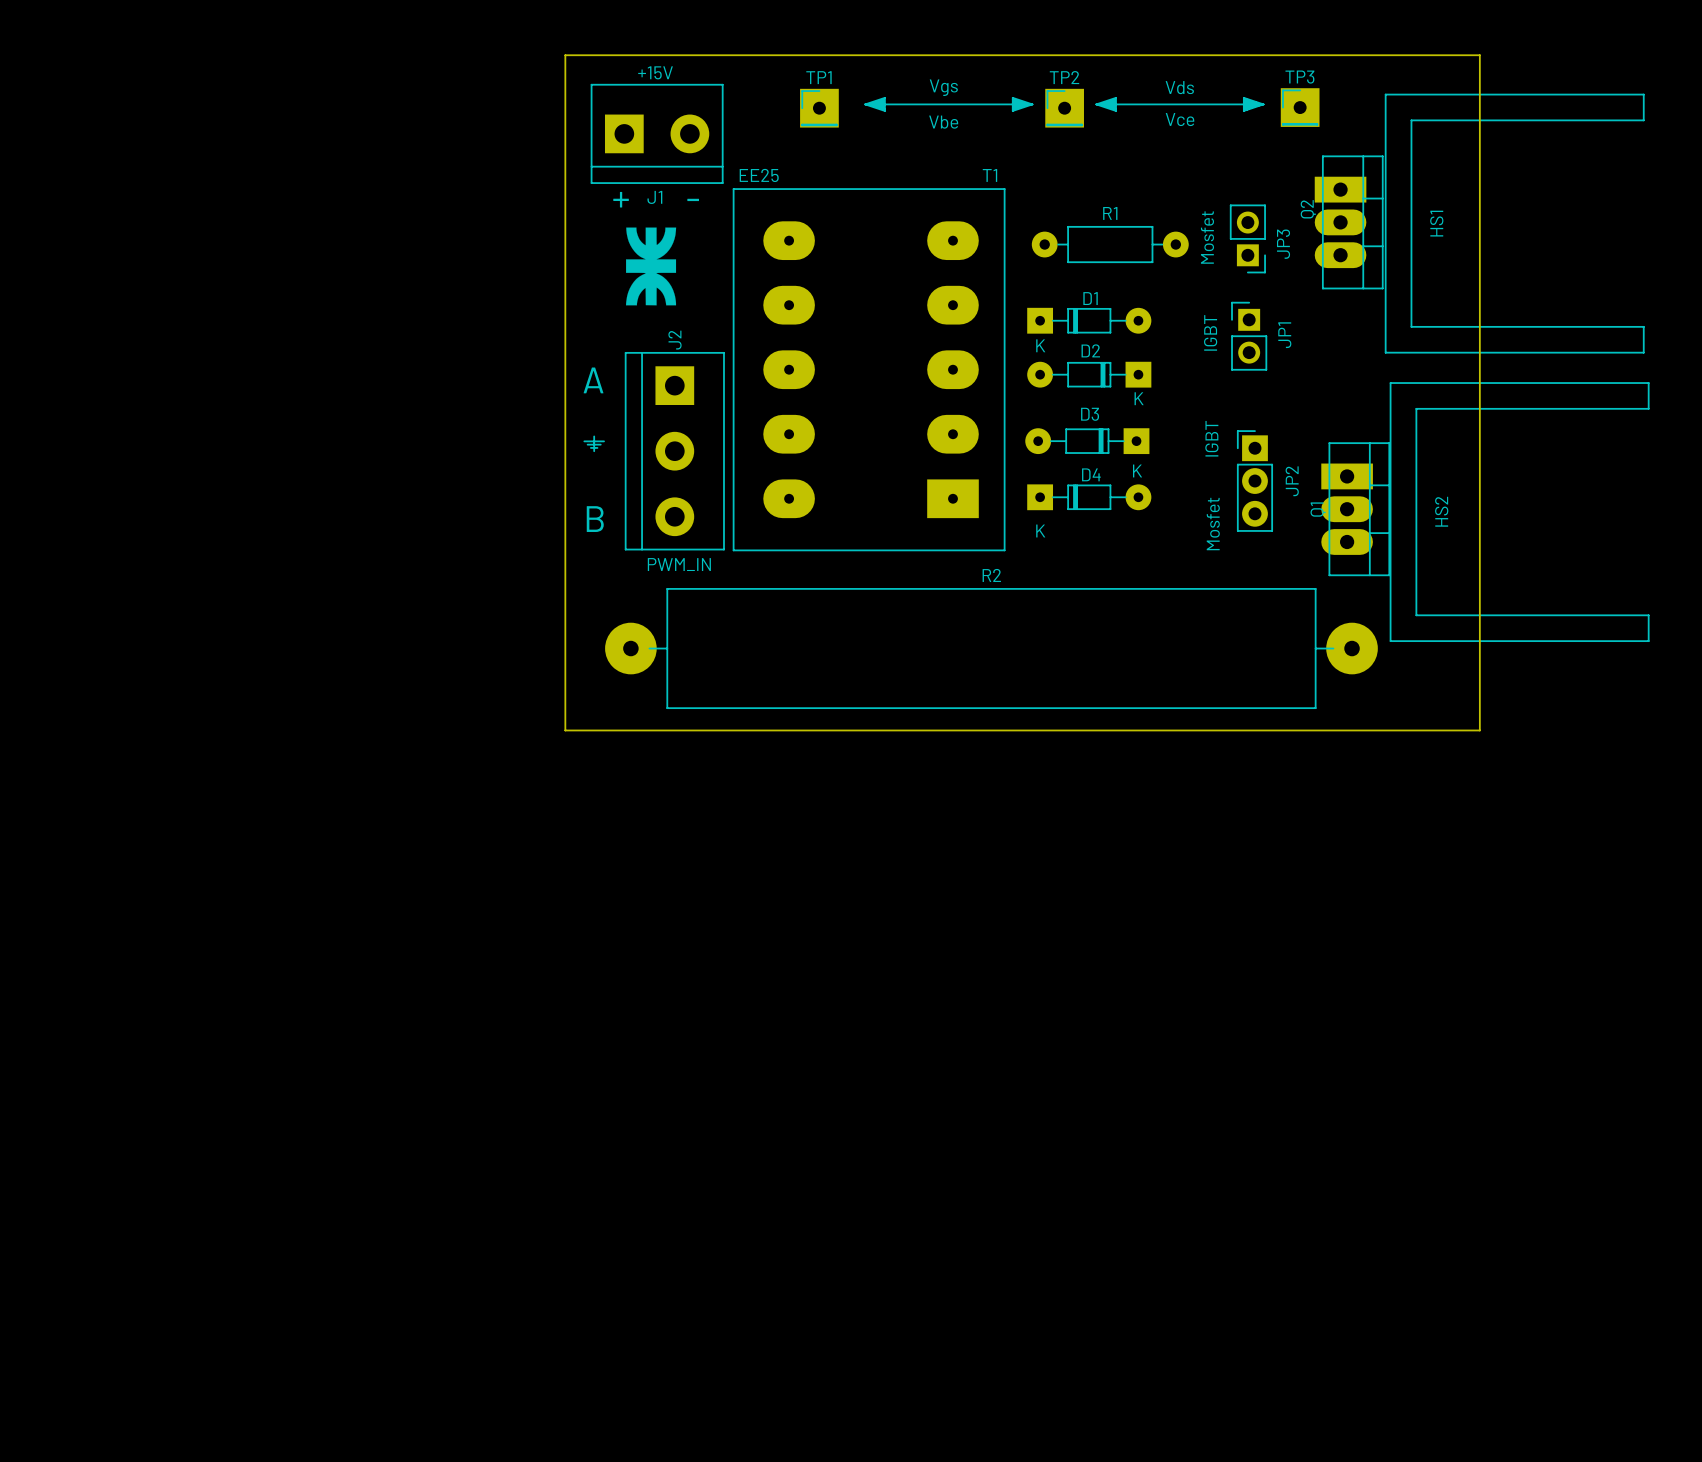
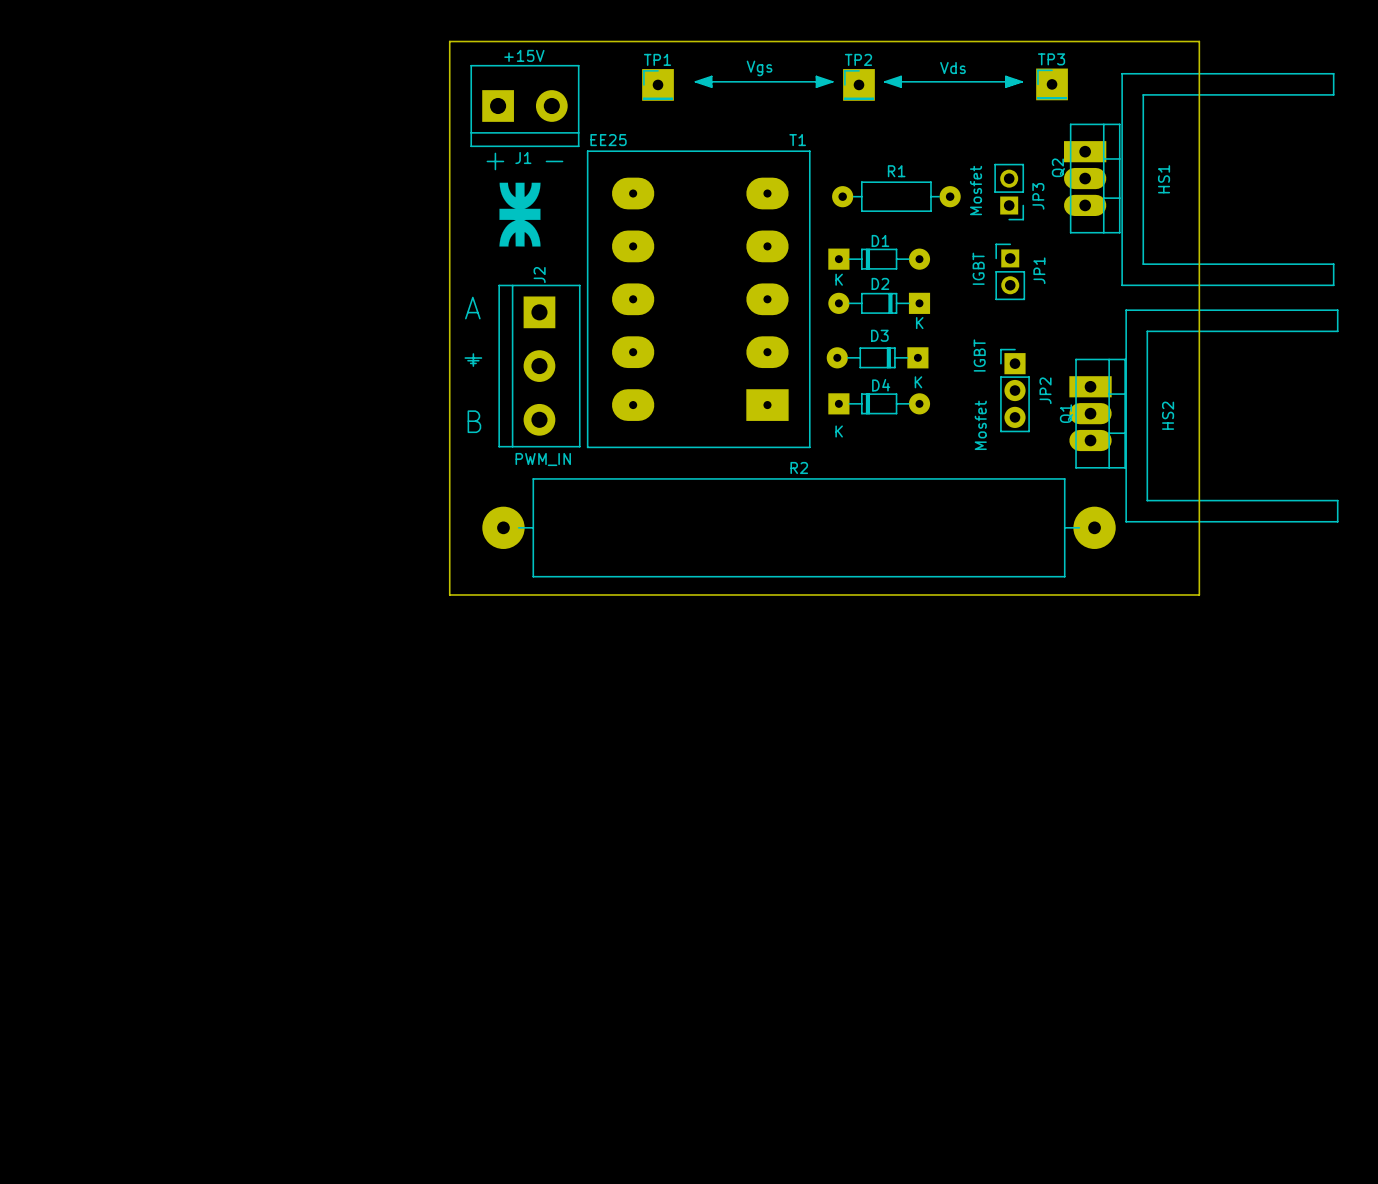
text: Vce (1180, 119) -> none
text: Vbe (943, 122) -> none

